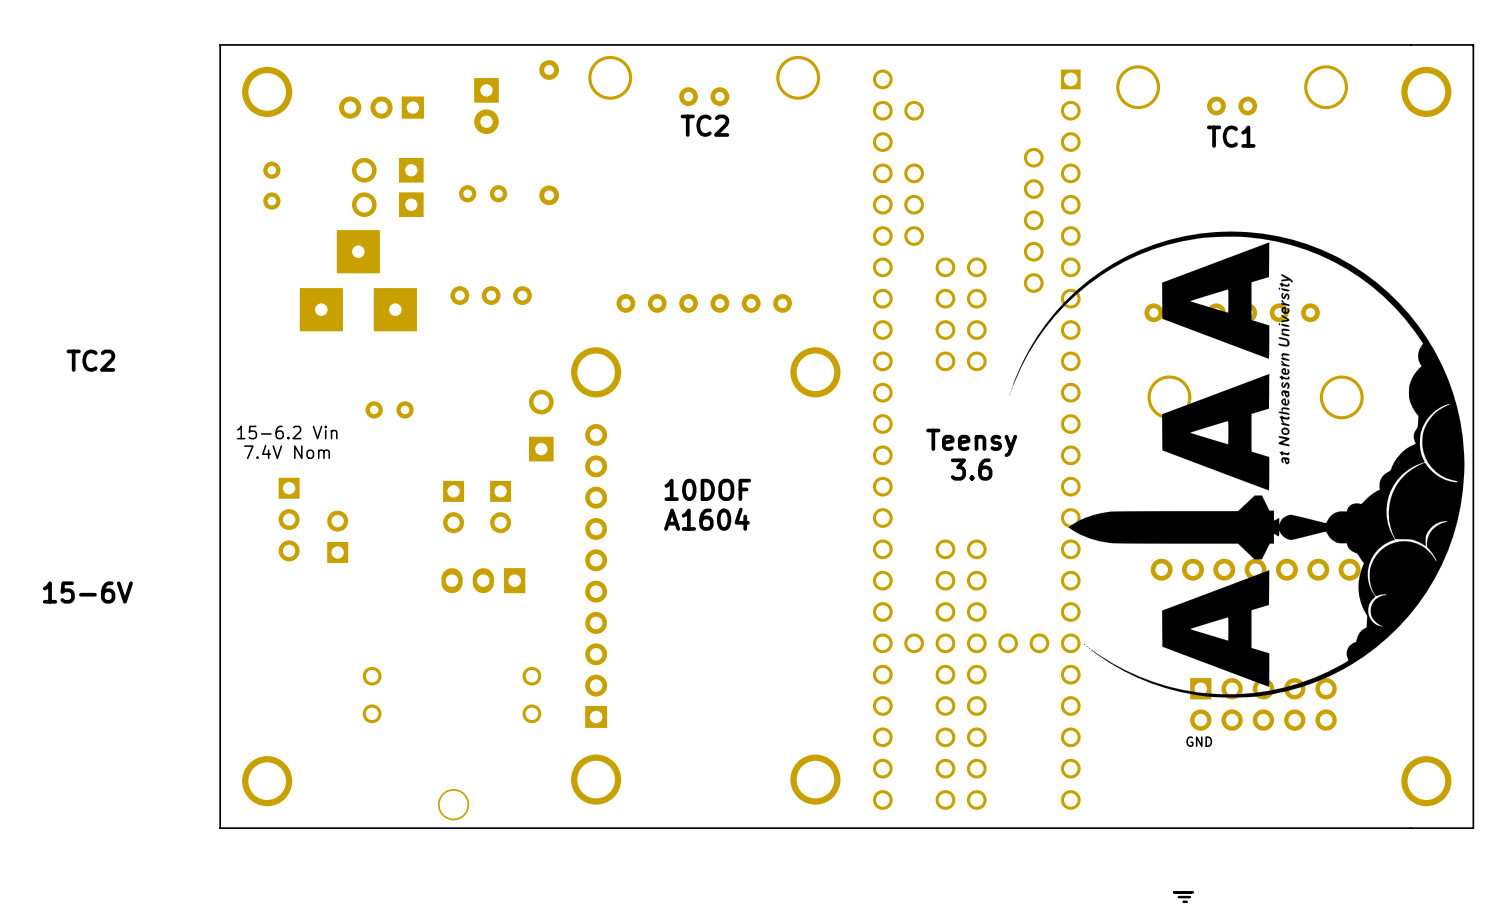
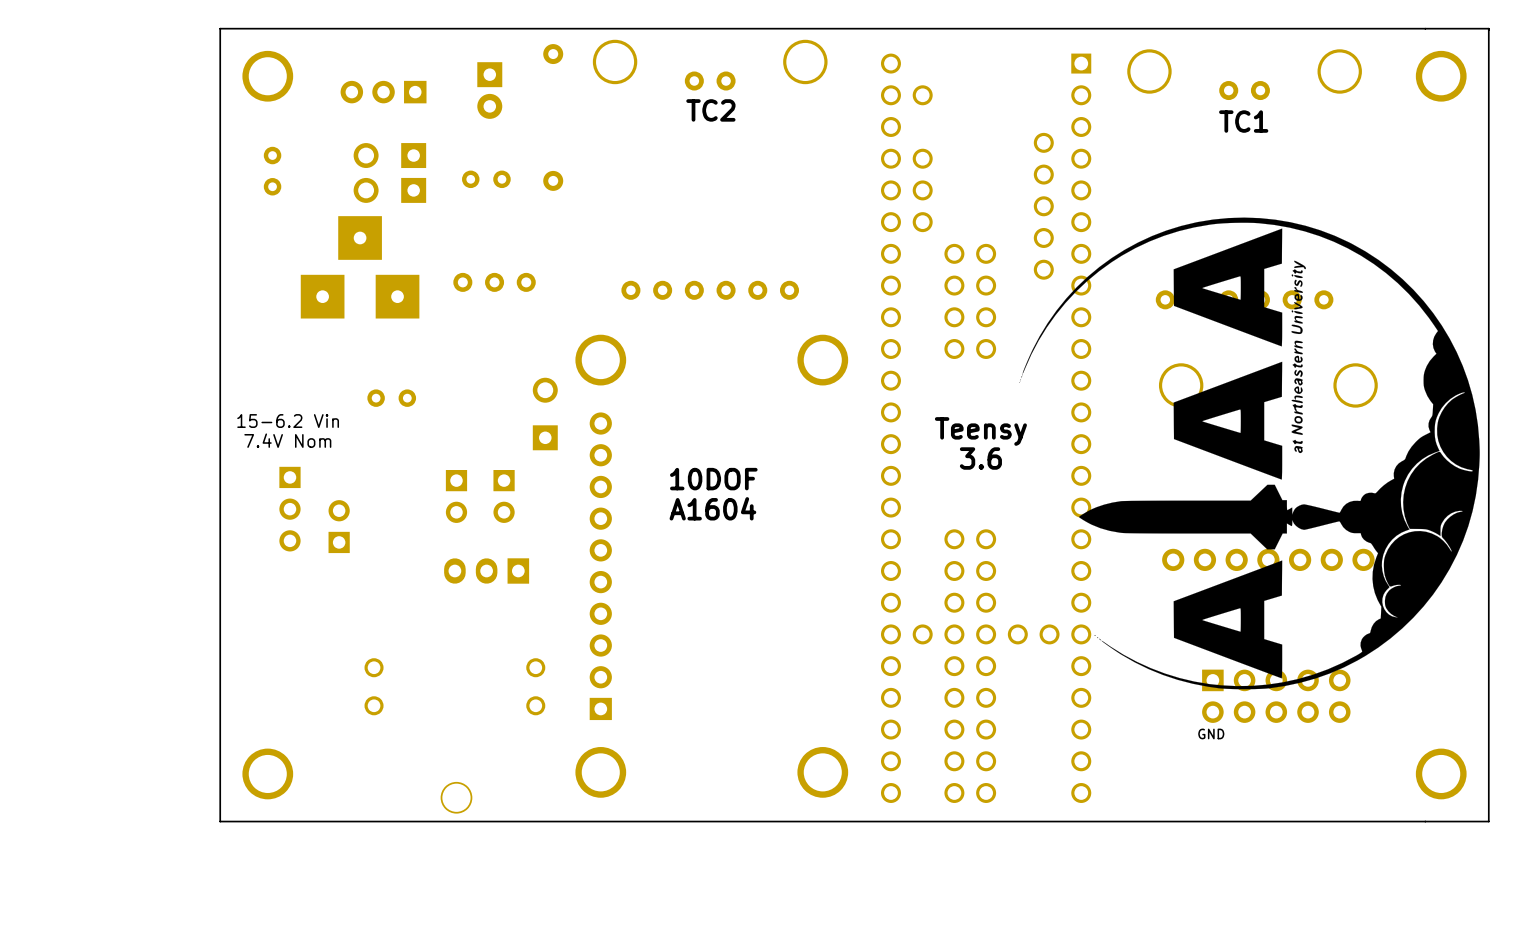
text: TC2 (90, 360) -> none
text: 15-6V (87, 592) -> none
line: (1192, 892) (1174, 892) -> none
line: (1189, 897) (1178, 897) -> none
line: (1186, 901) (1183, 901) -> none

